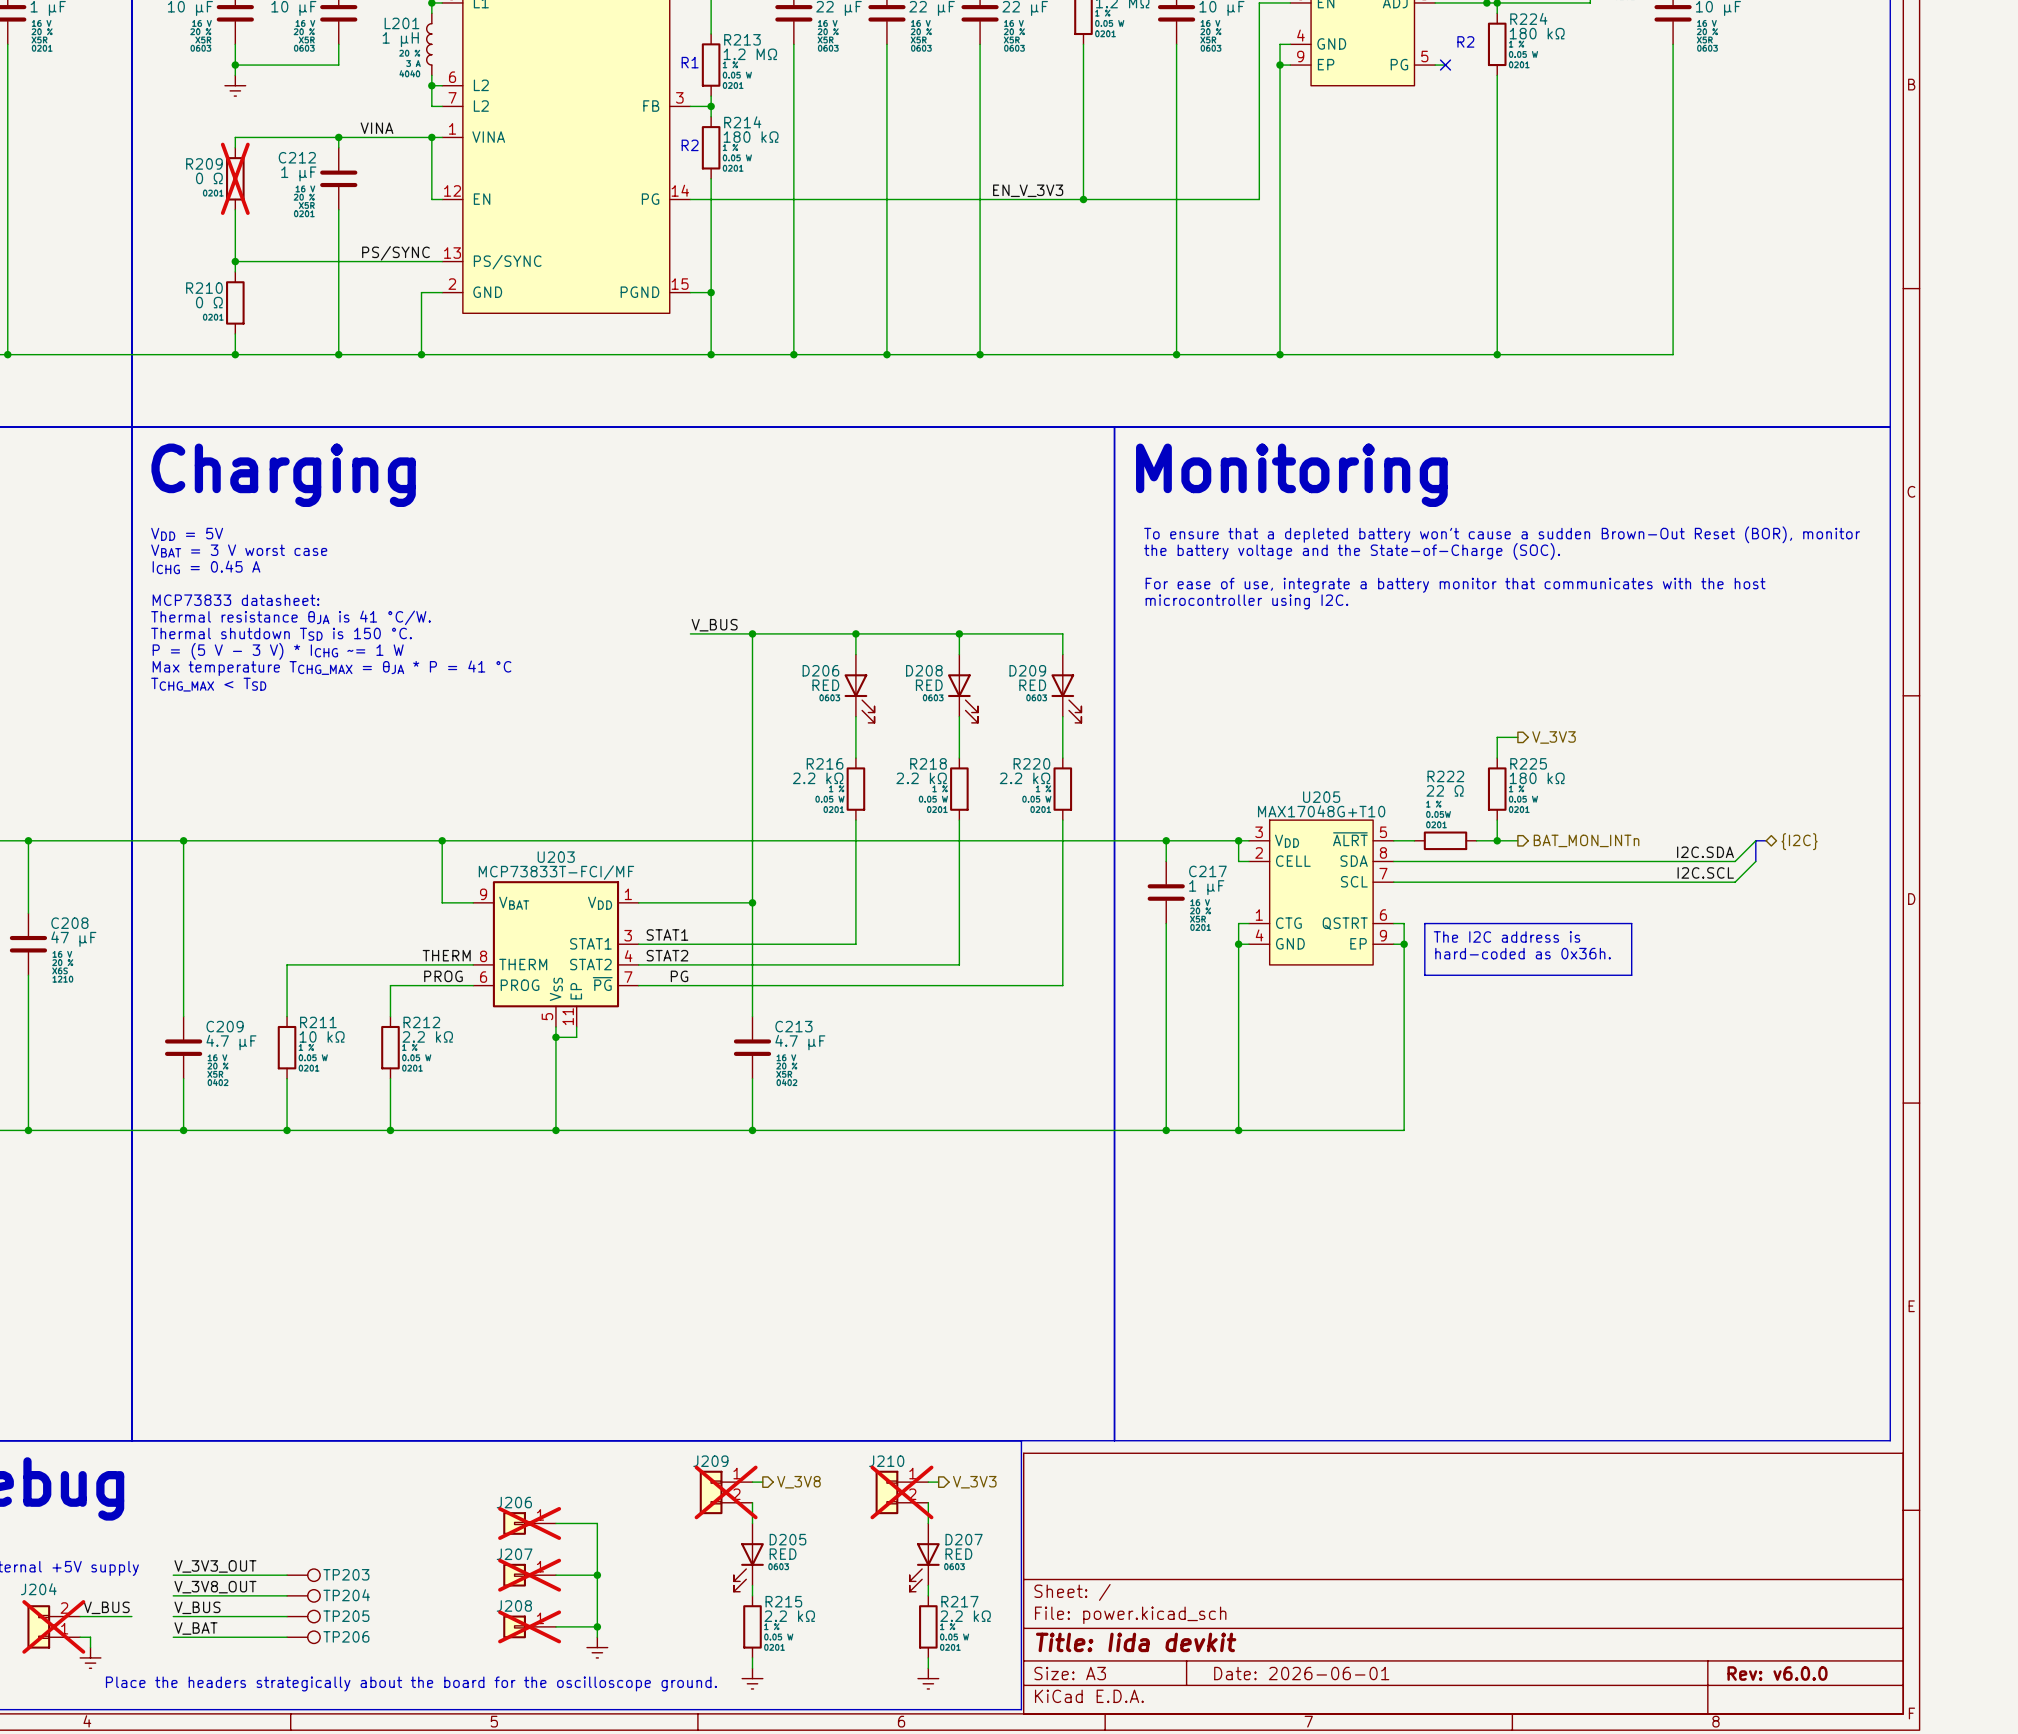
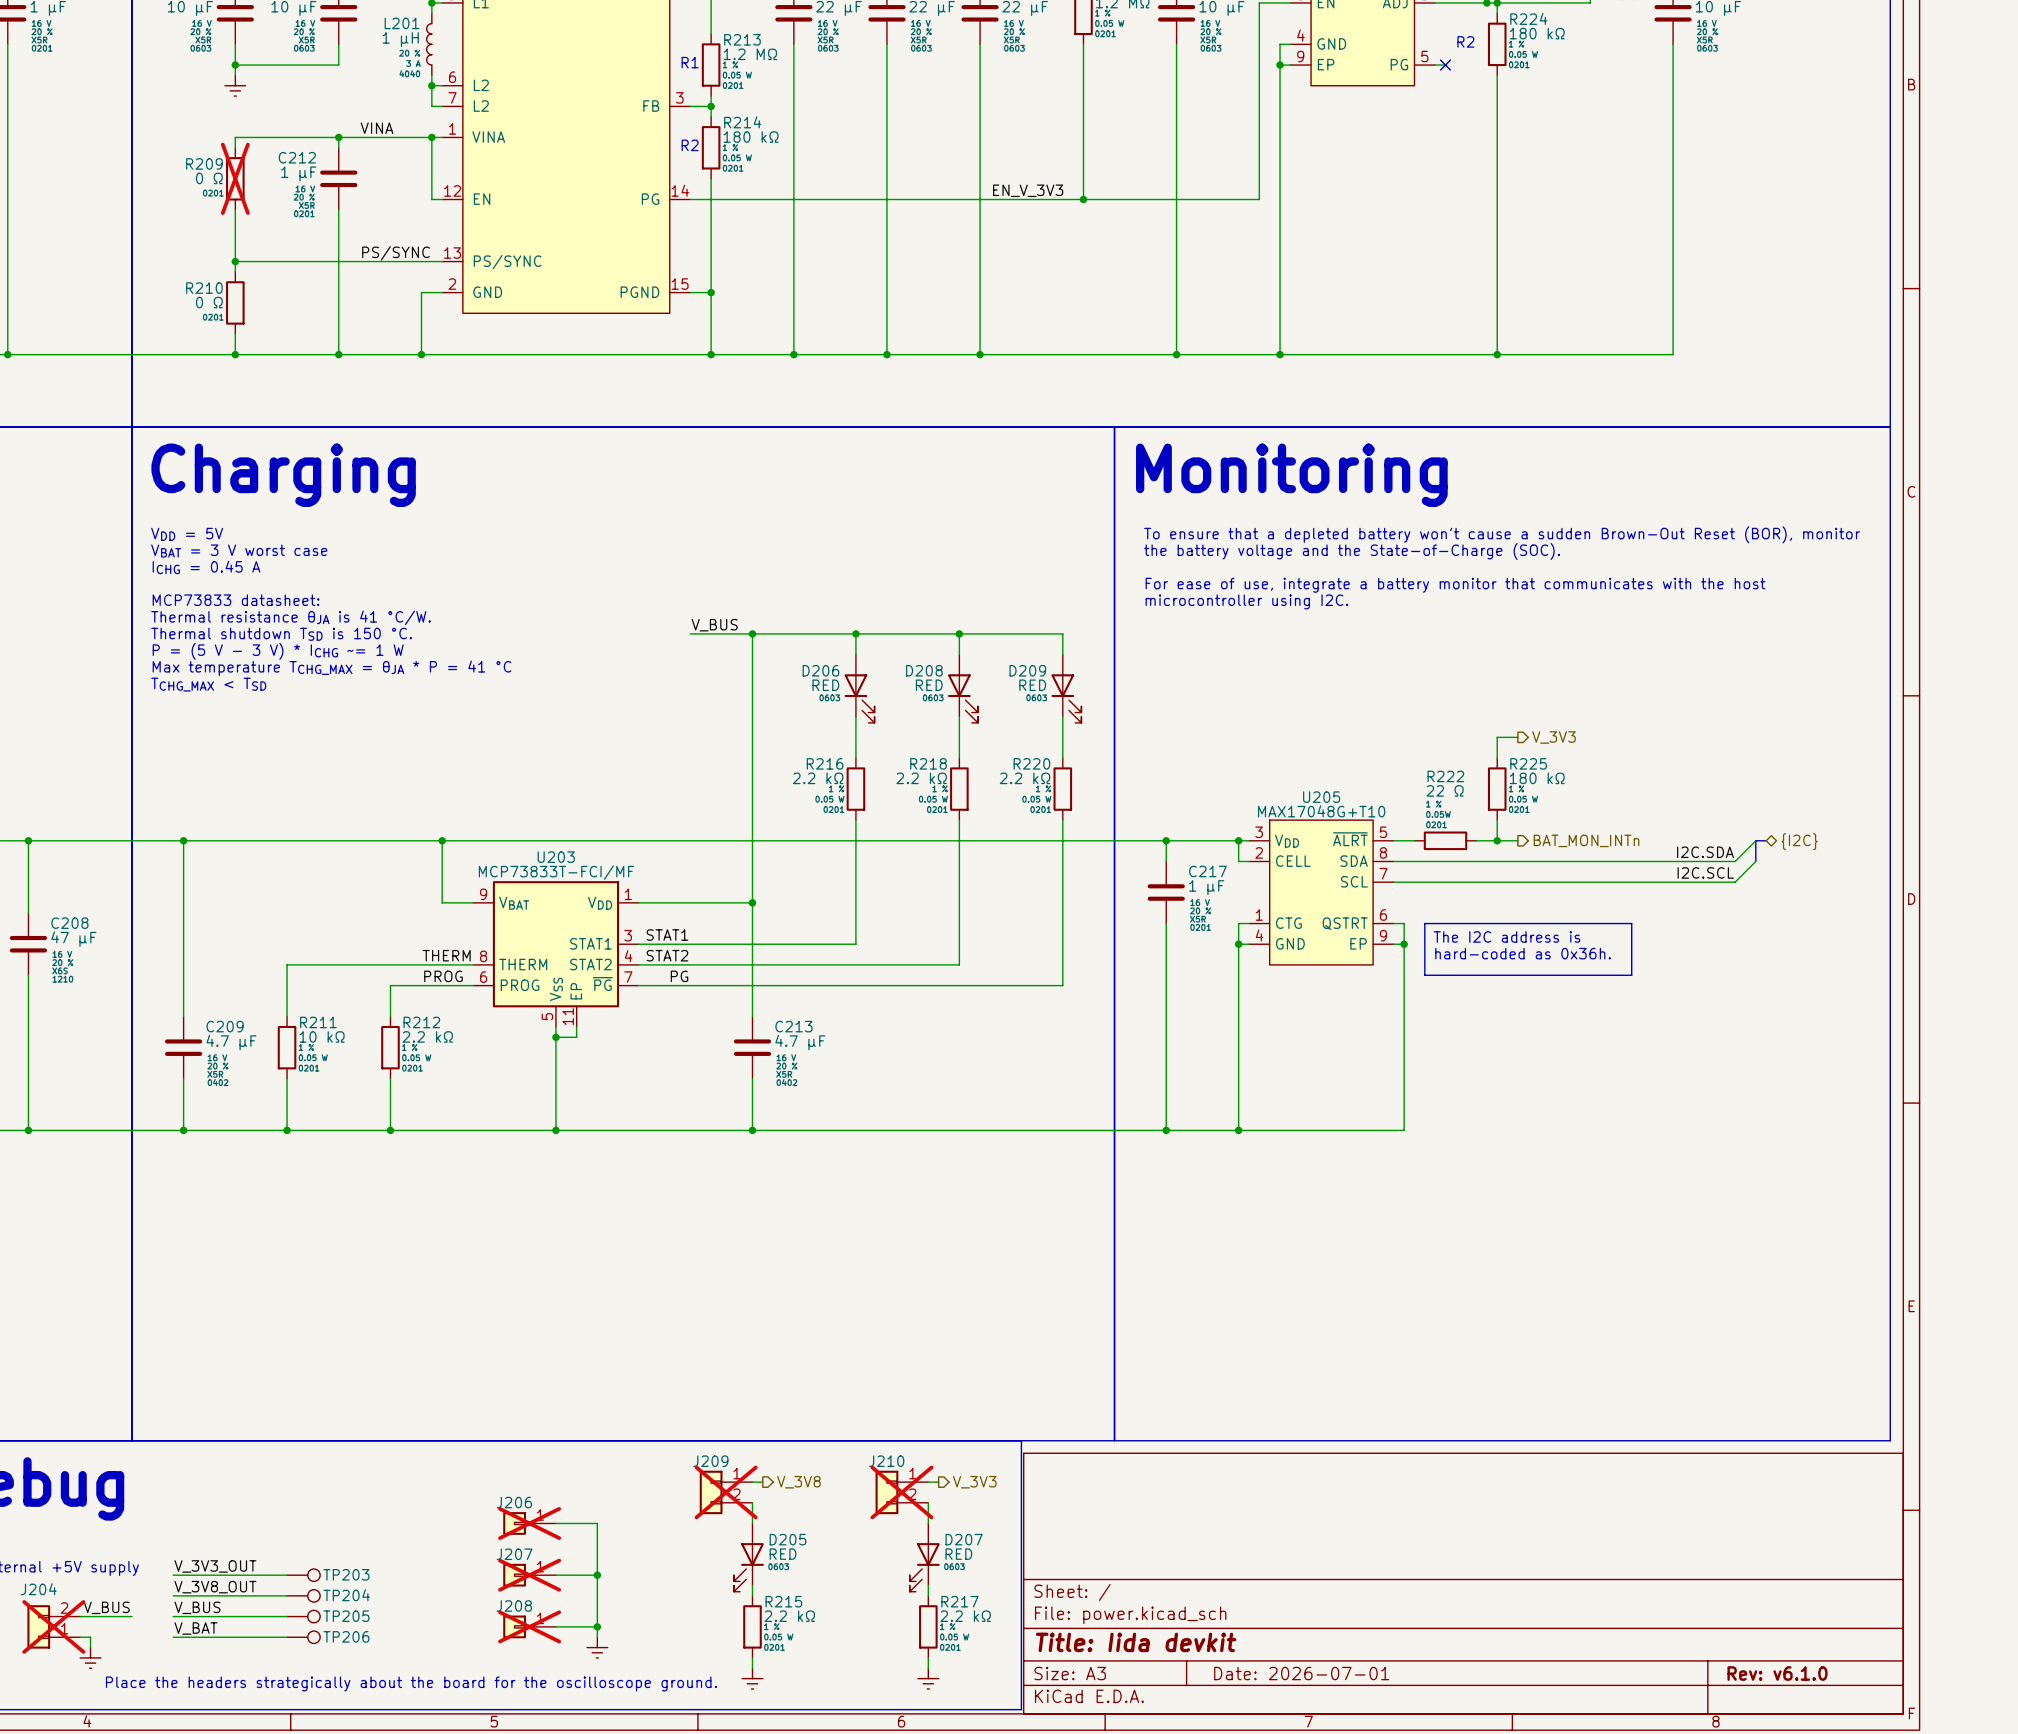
title block: Date: 2026-06-01 (1301, 1673) -> Date: 2026-07-01 (1301, 1673)
title block: Rev: v6.0.0 (1777, 1673) -> Rev: v6.1.0 (1777, 1673)

